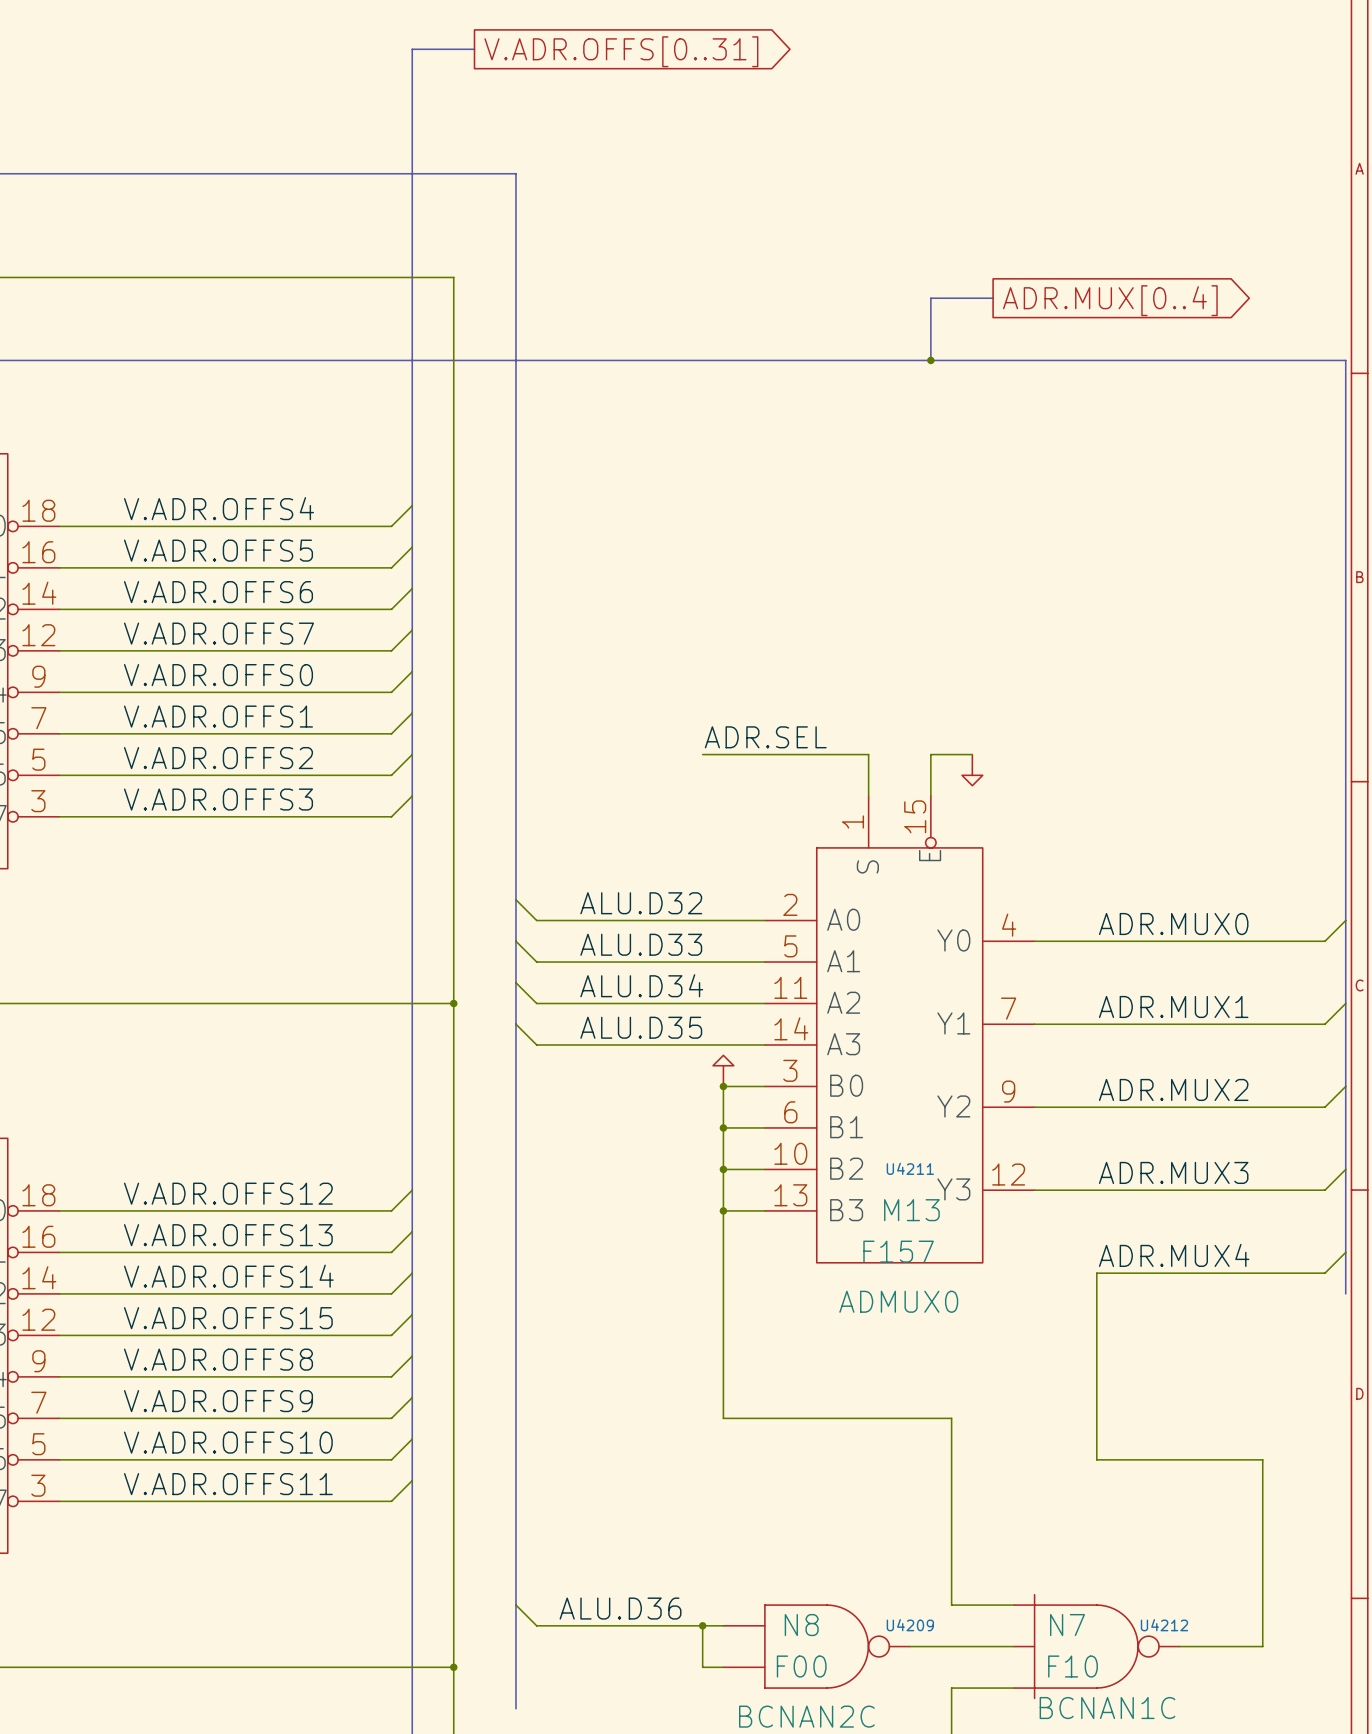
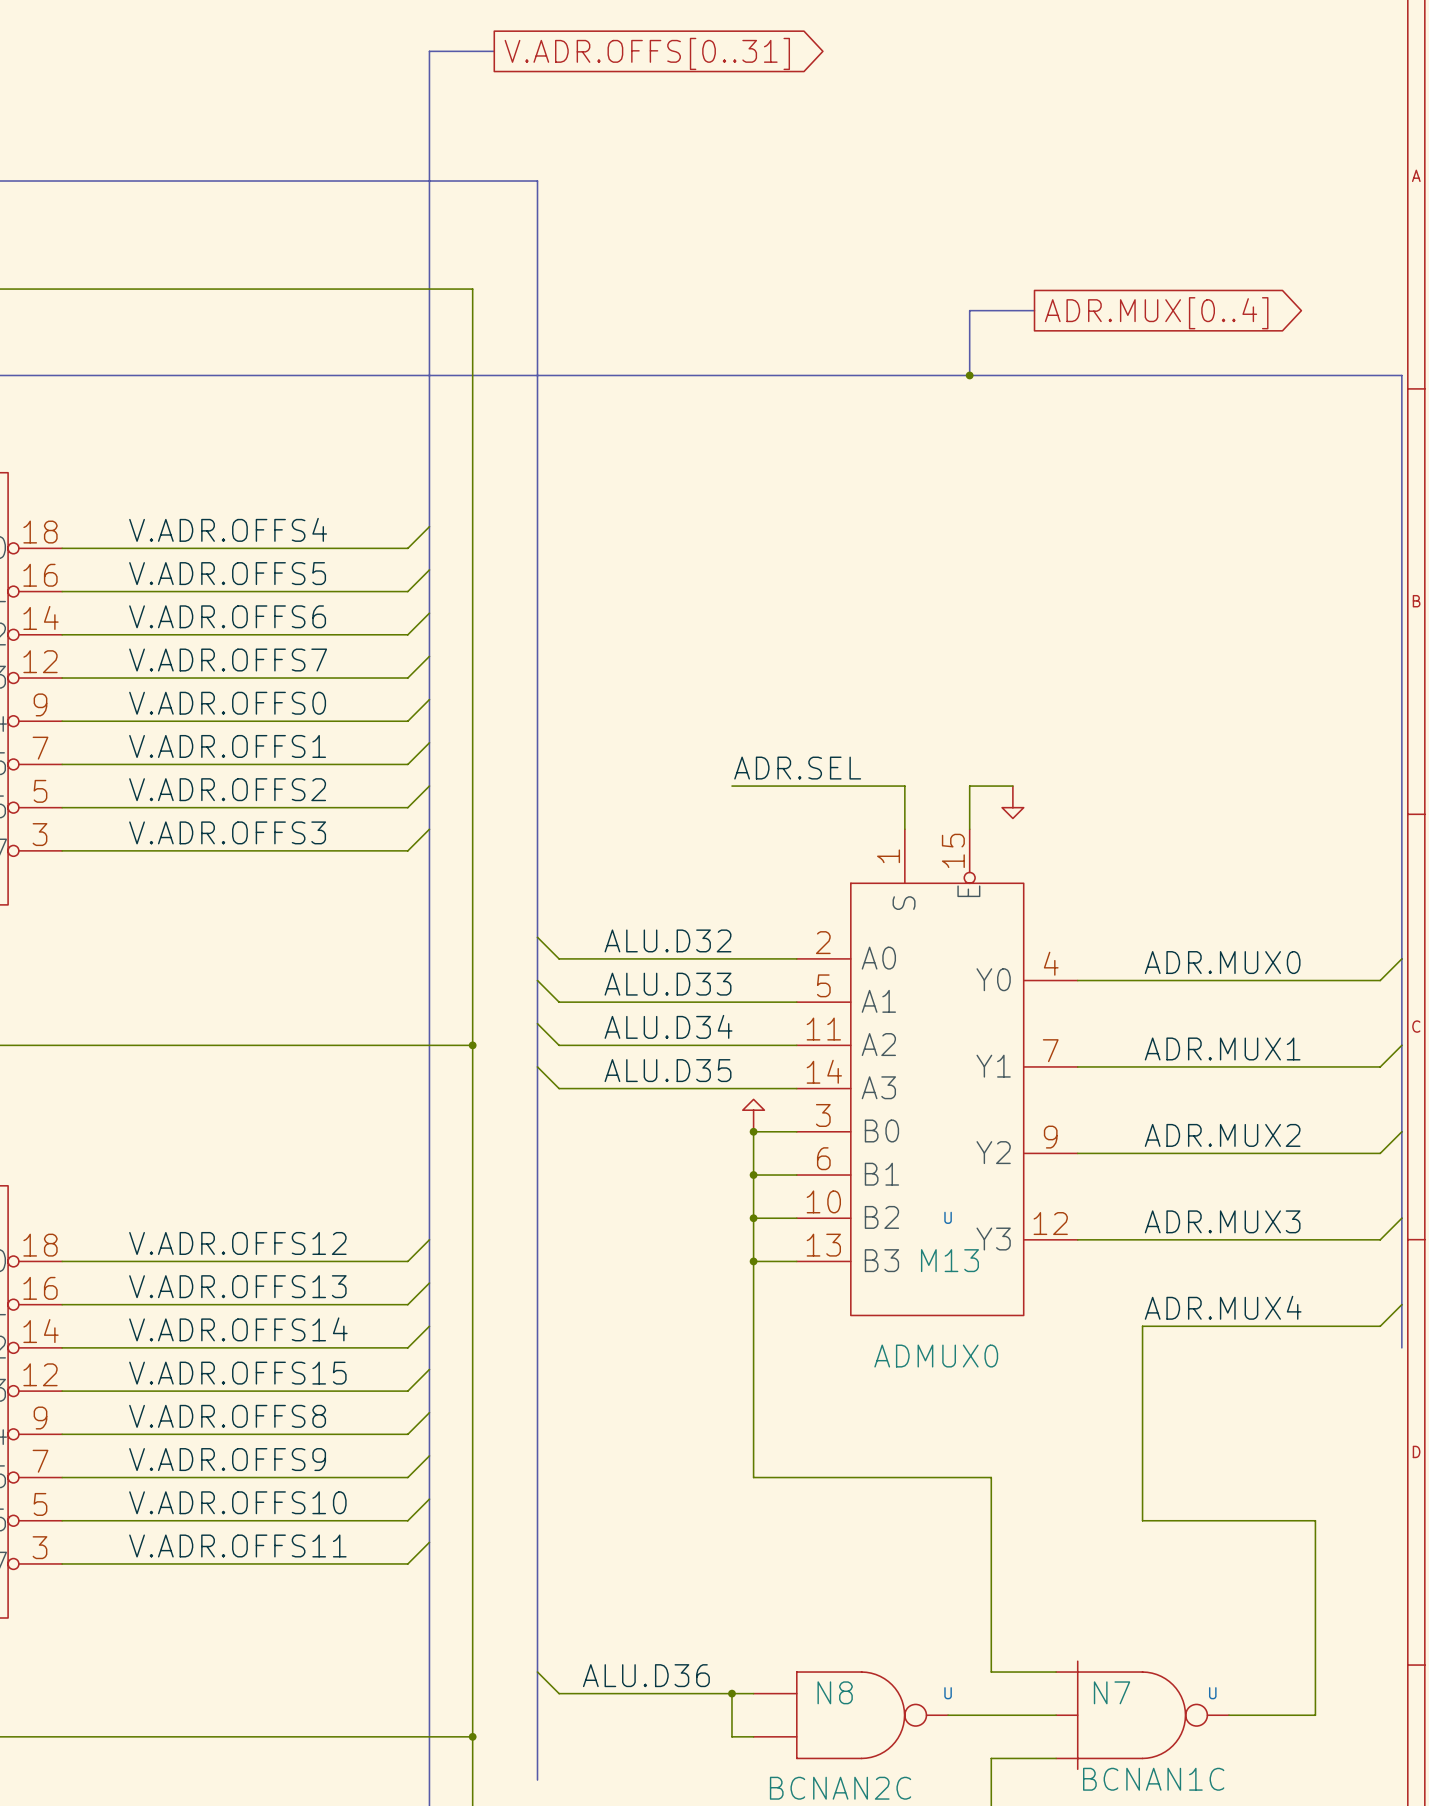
U4211 name: U4211 (910, 1168) -> U (948, 1217)
U4211 value: F157 (898, 1251) -> none
U4209 name: U4209 (910, 1625) -> U (948, 1693)
U4212 name: U4212 (1164, 1625) -> U (1212, 1693)
U4209 value: F00 (801, 1666) -> none
U4212 value: F10 (1073, 1666) -> none

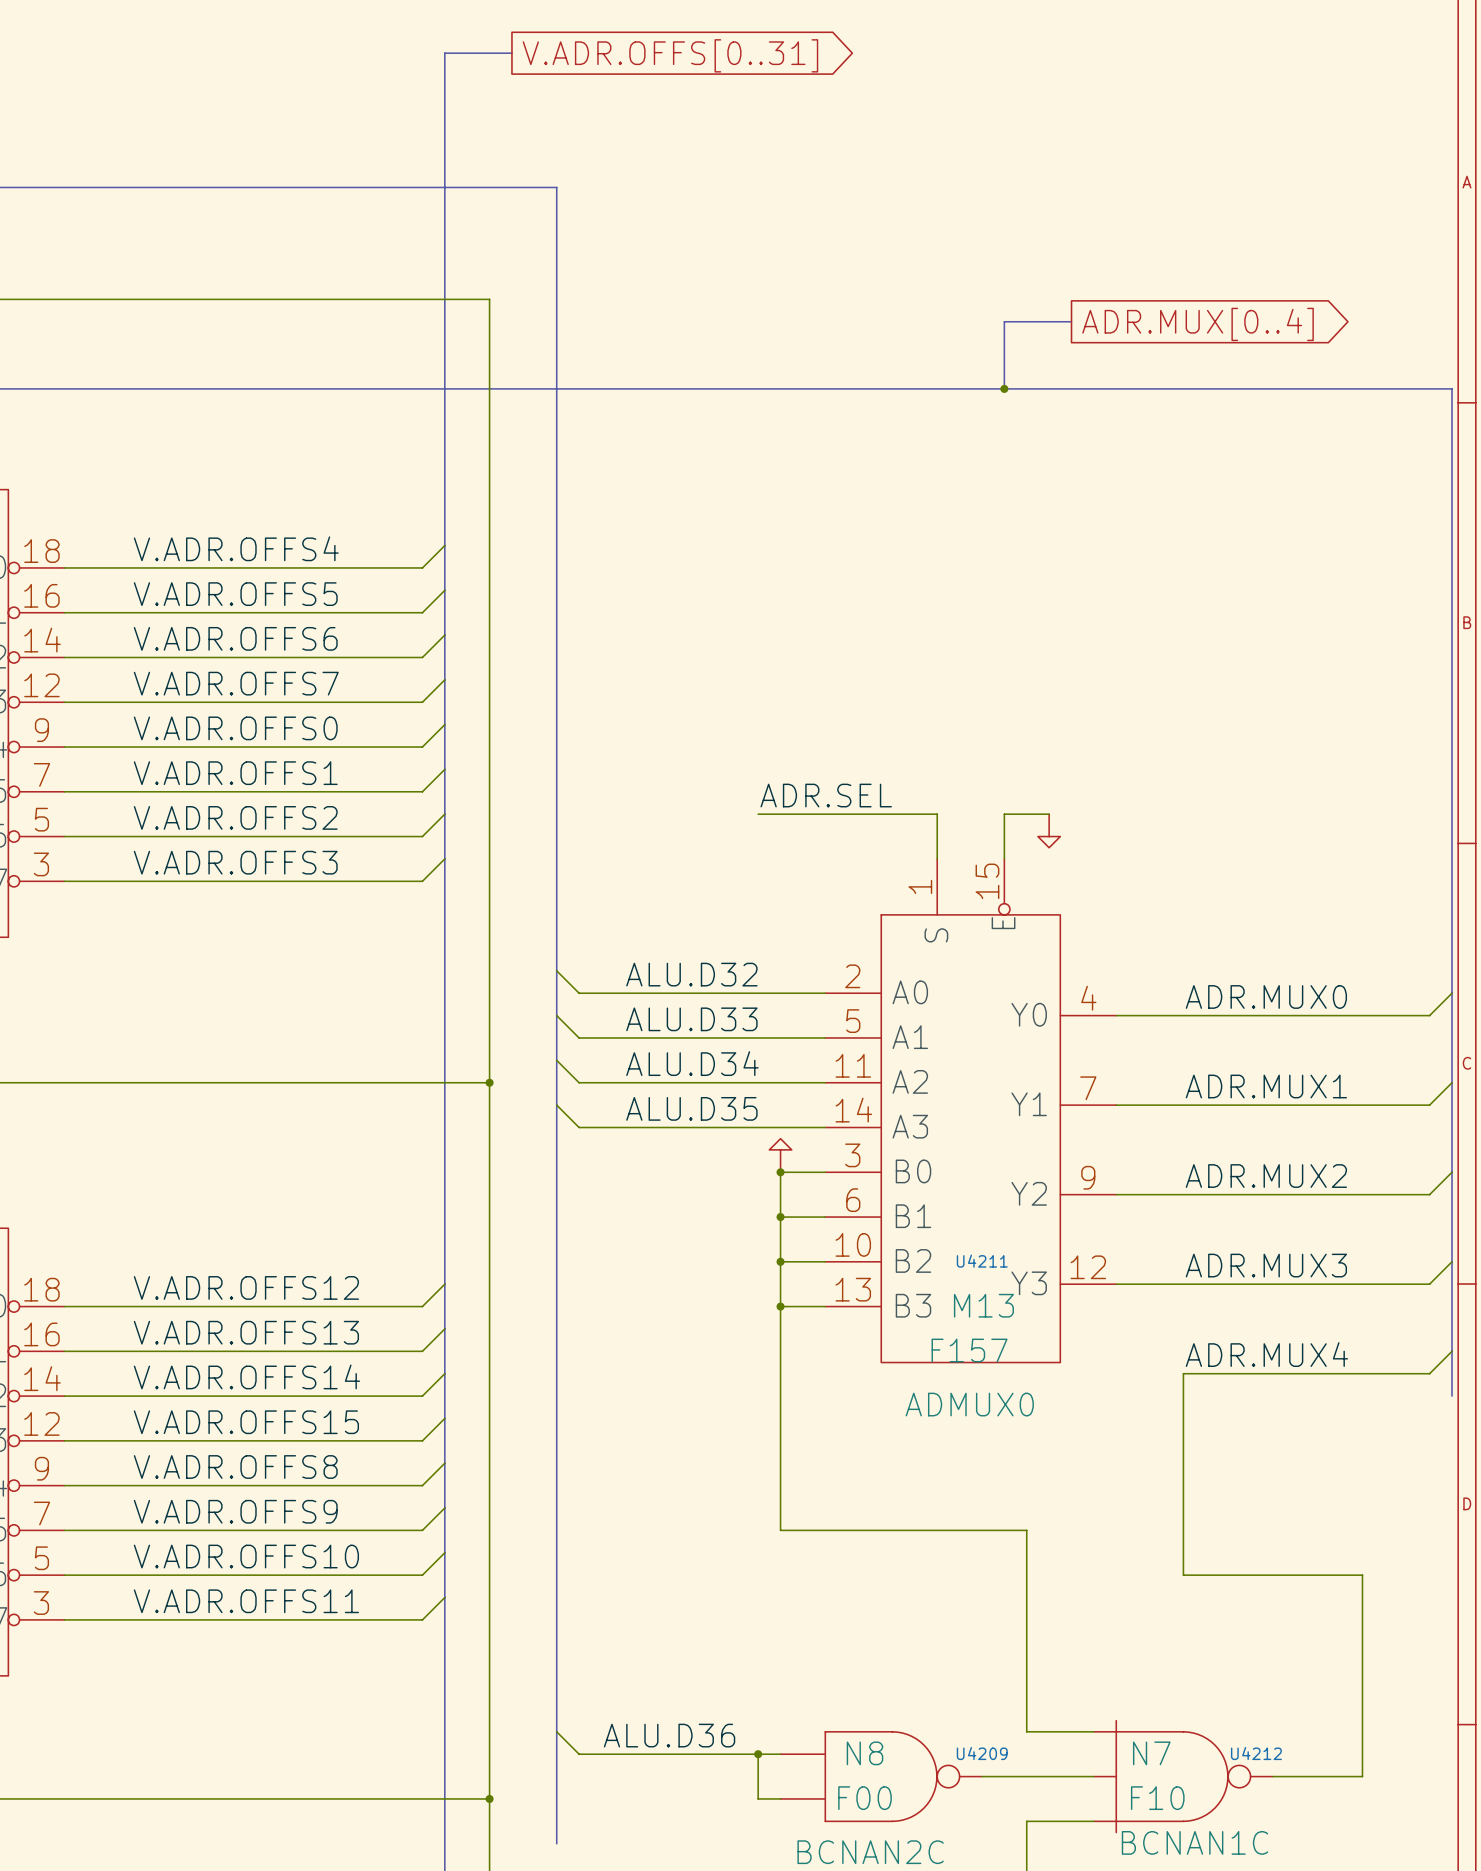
U name: U (948, 1217) -> U4211 (982, 1261)
U value: none -> F157 (969, 1350)
U name: U (948, 1693) -> U4209 (982, 1753)
U name: U (1212, 1693) -> U4212 (1256, 1753)
U value: none -> F00 (865, 1798)
U value: none -> F10 (1157, 1798)

